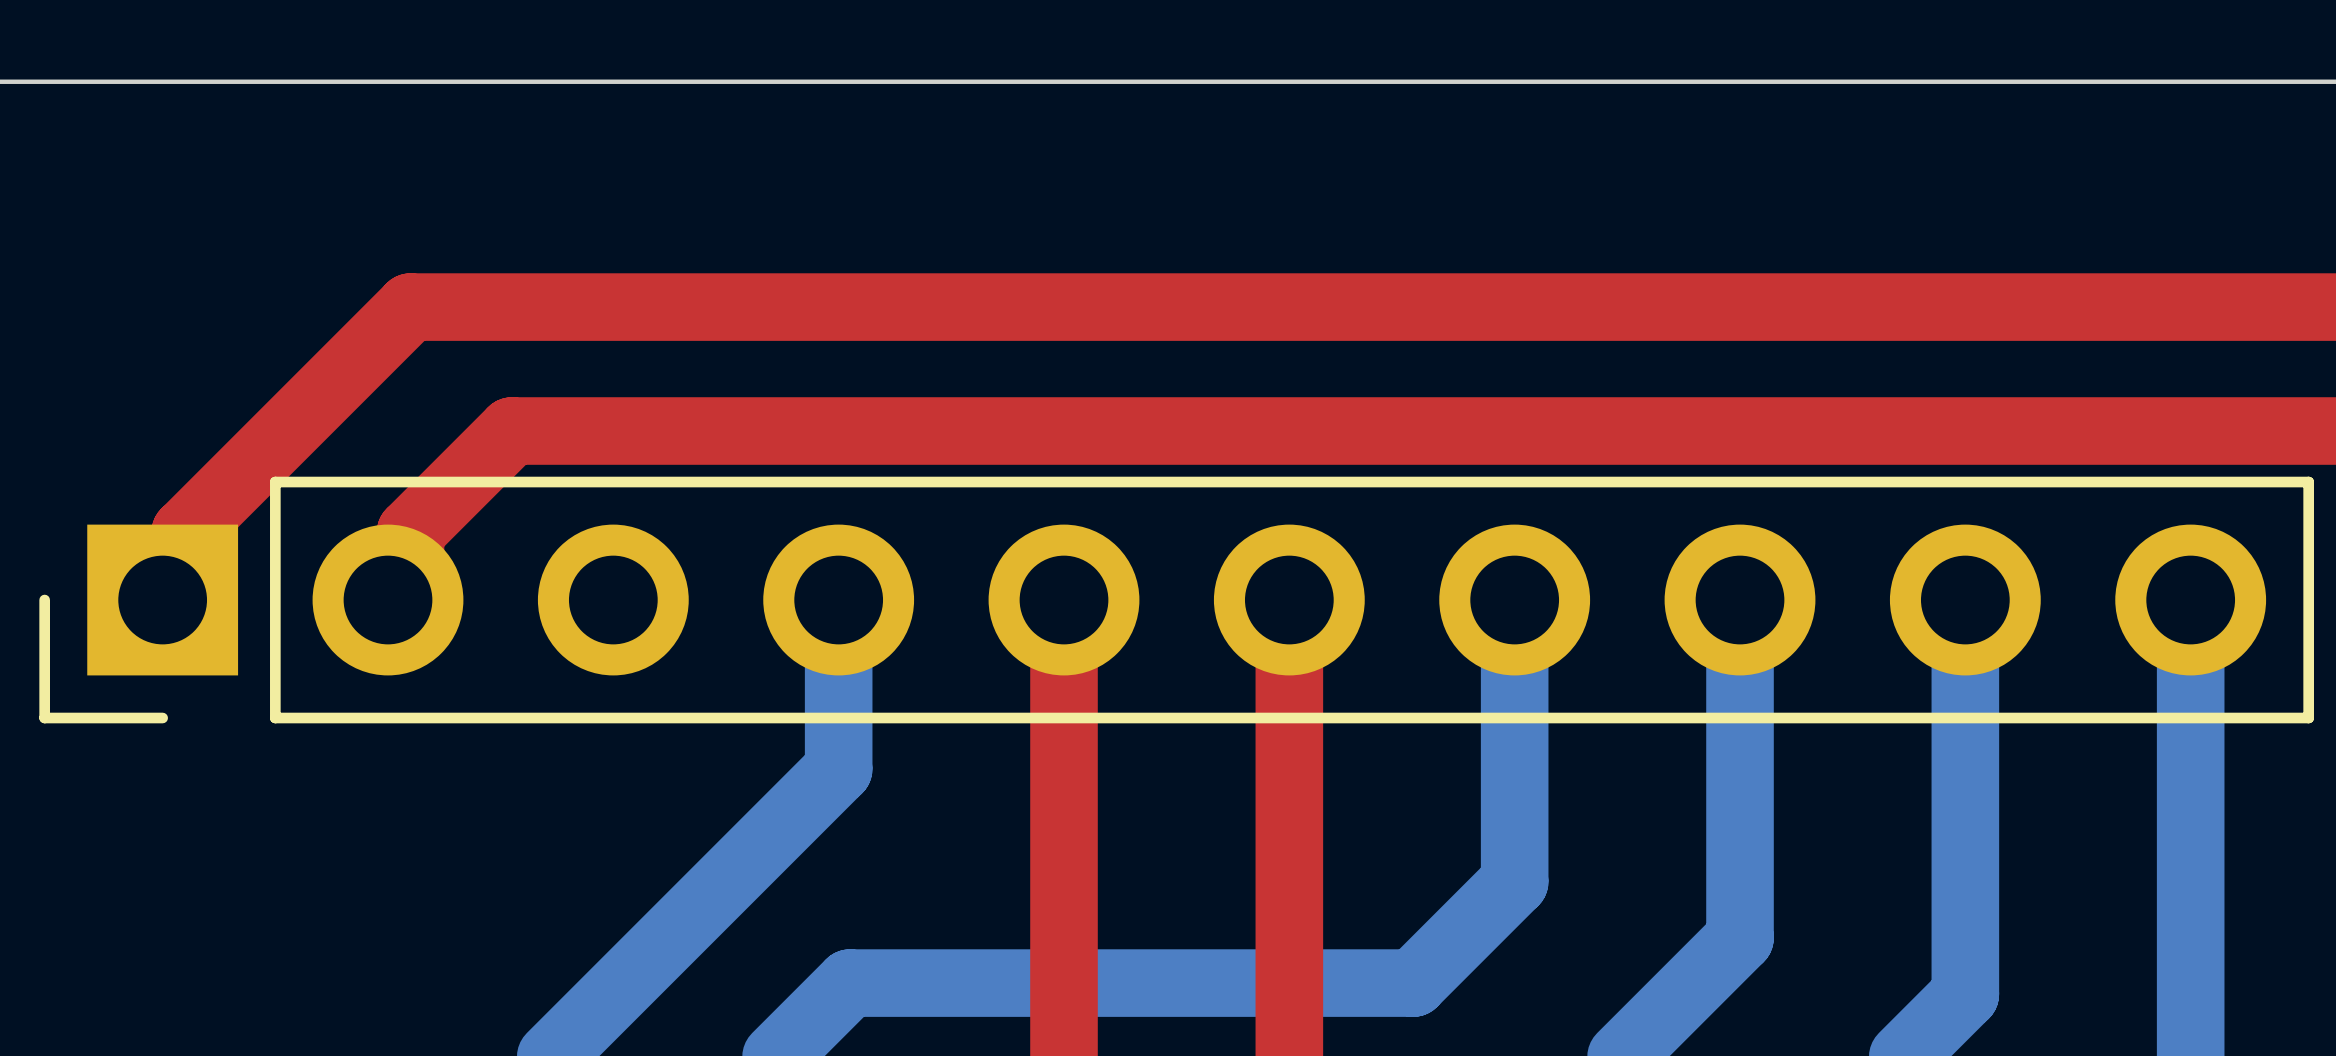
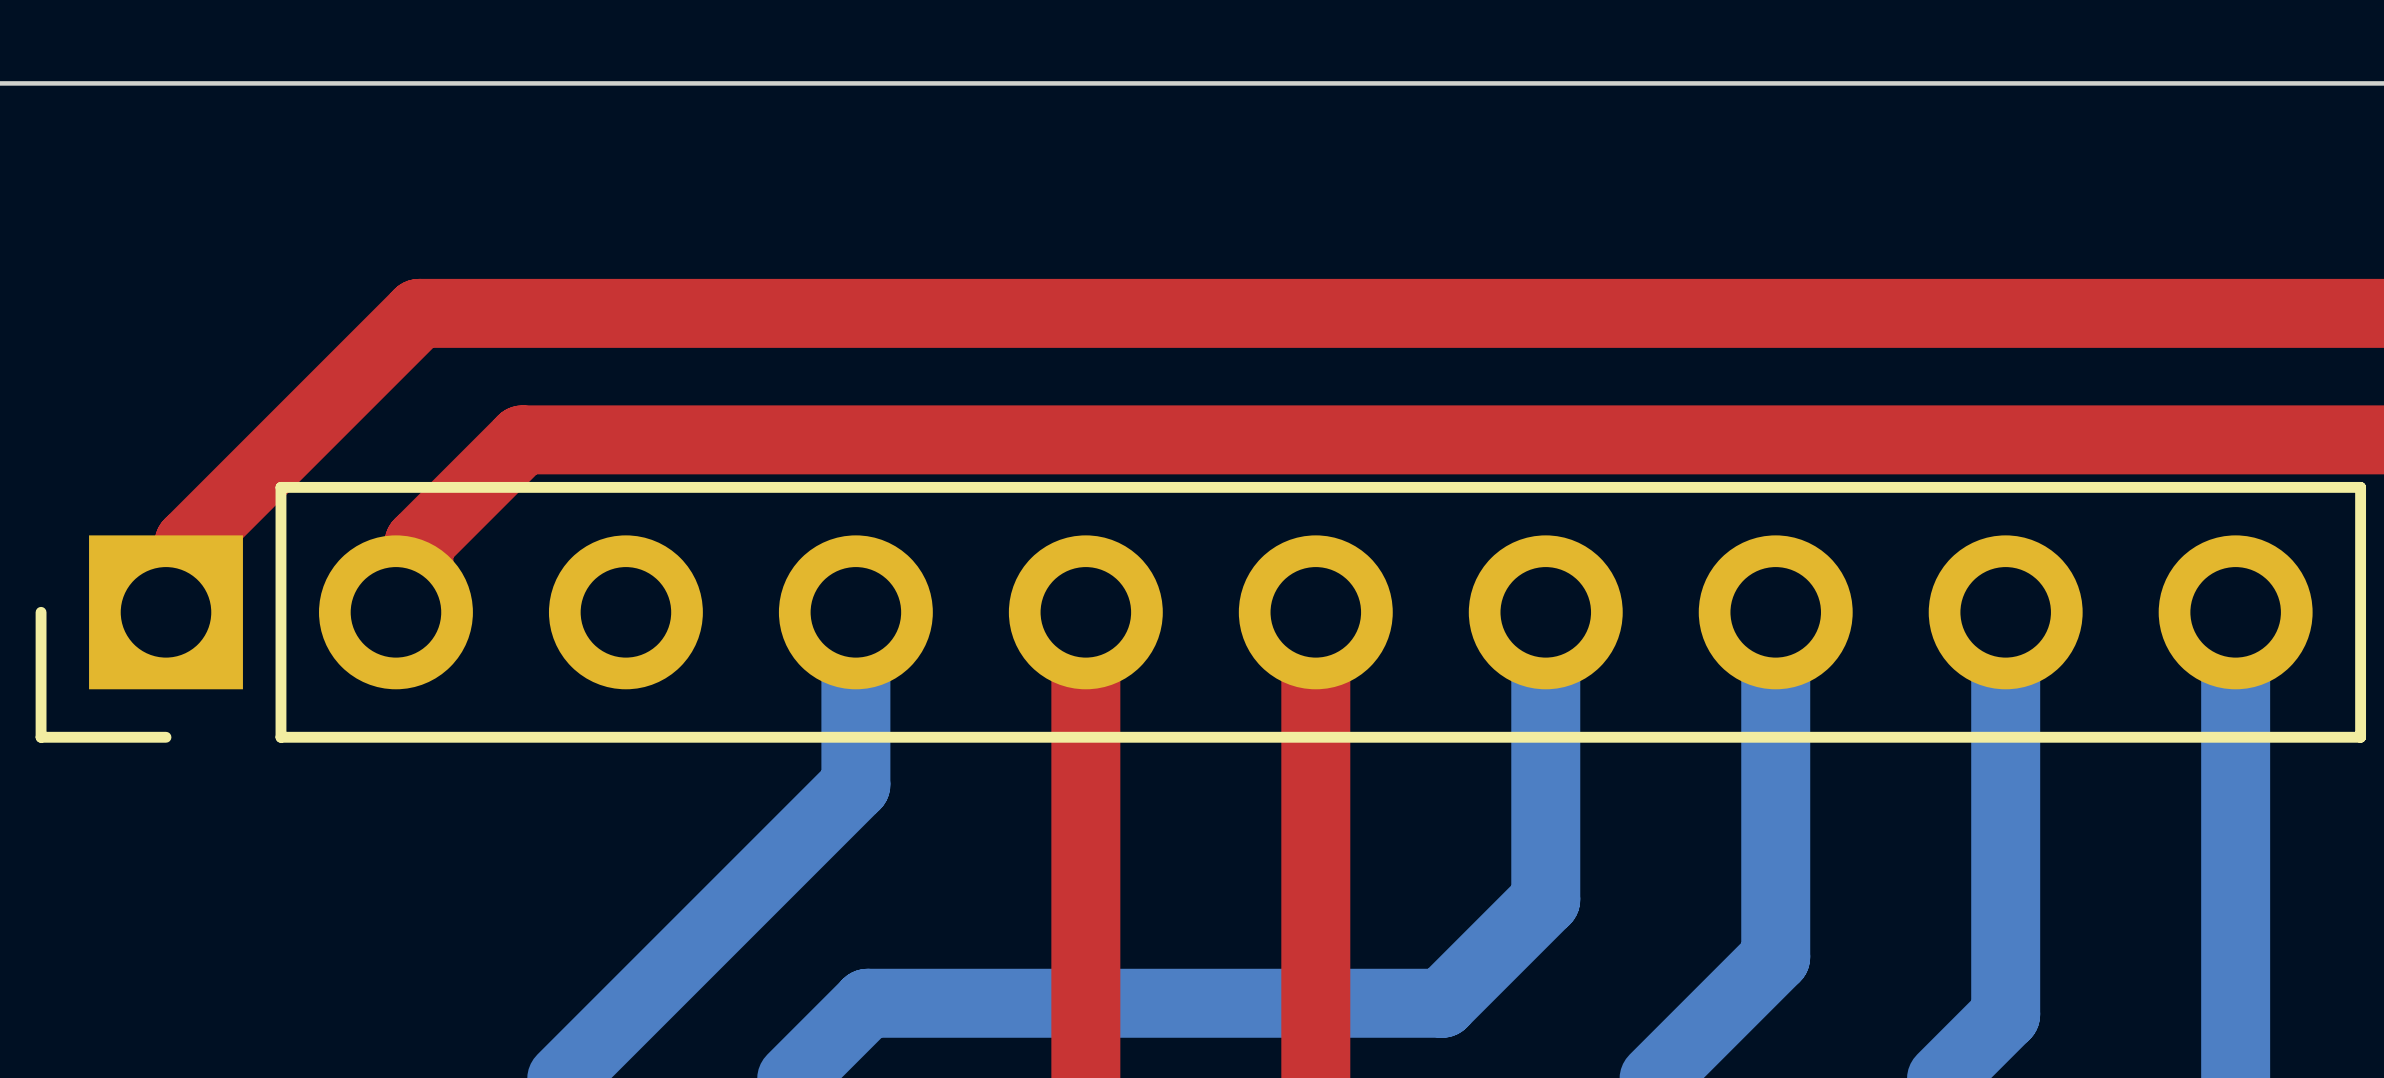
part footprint: [39, 476, 2314, 724] -> [35, 481, 2367, 743]

